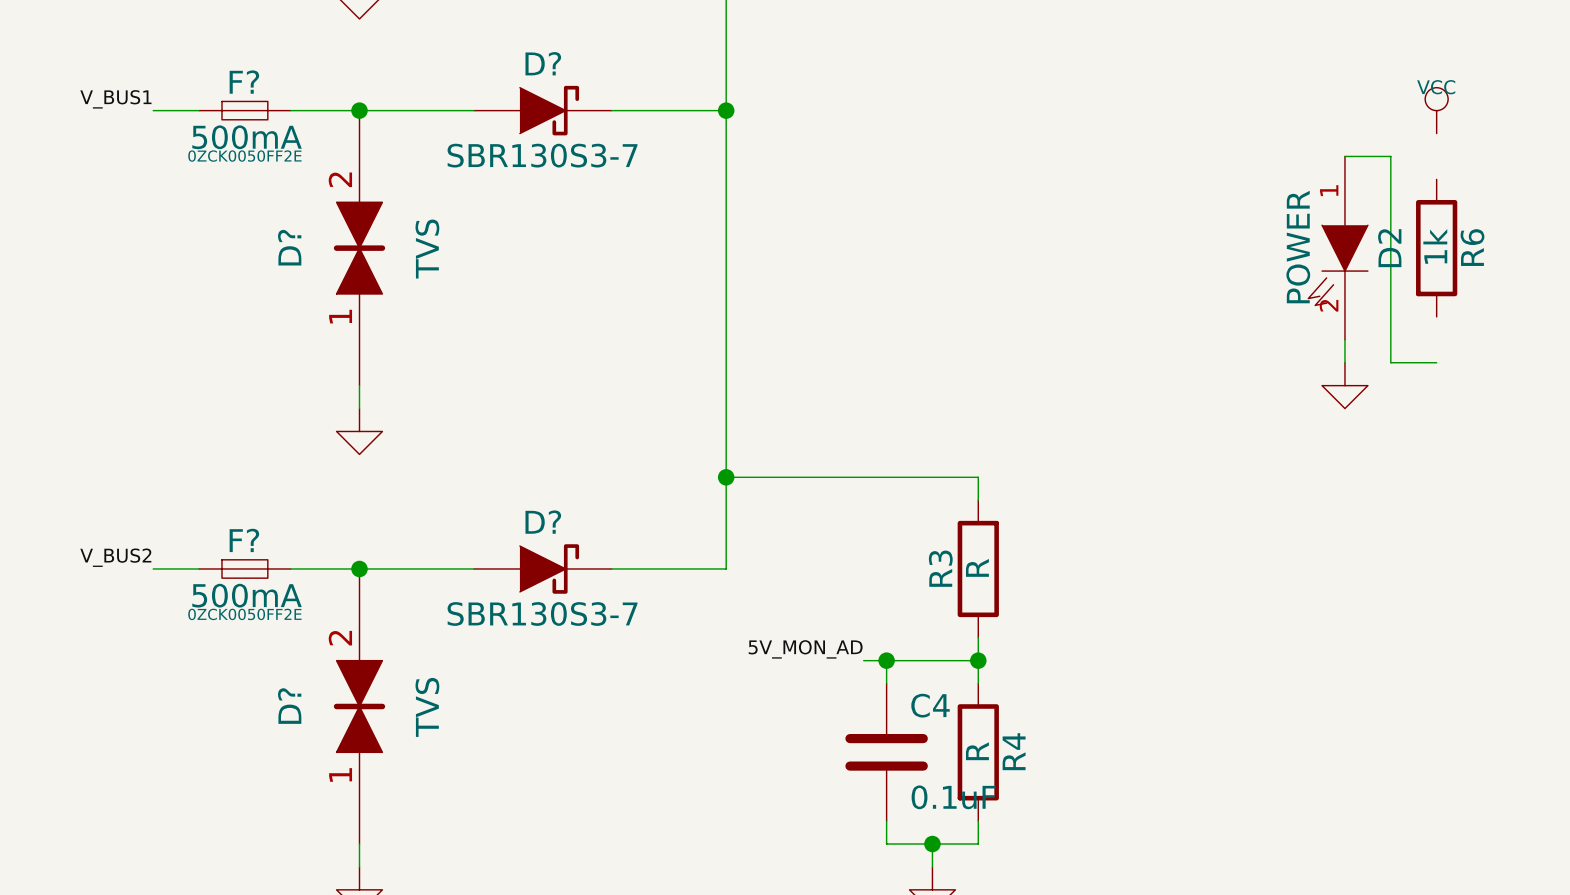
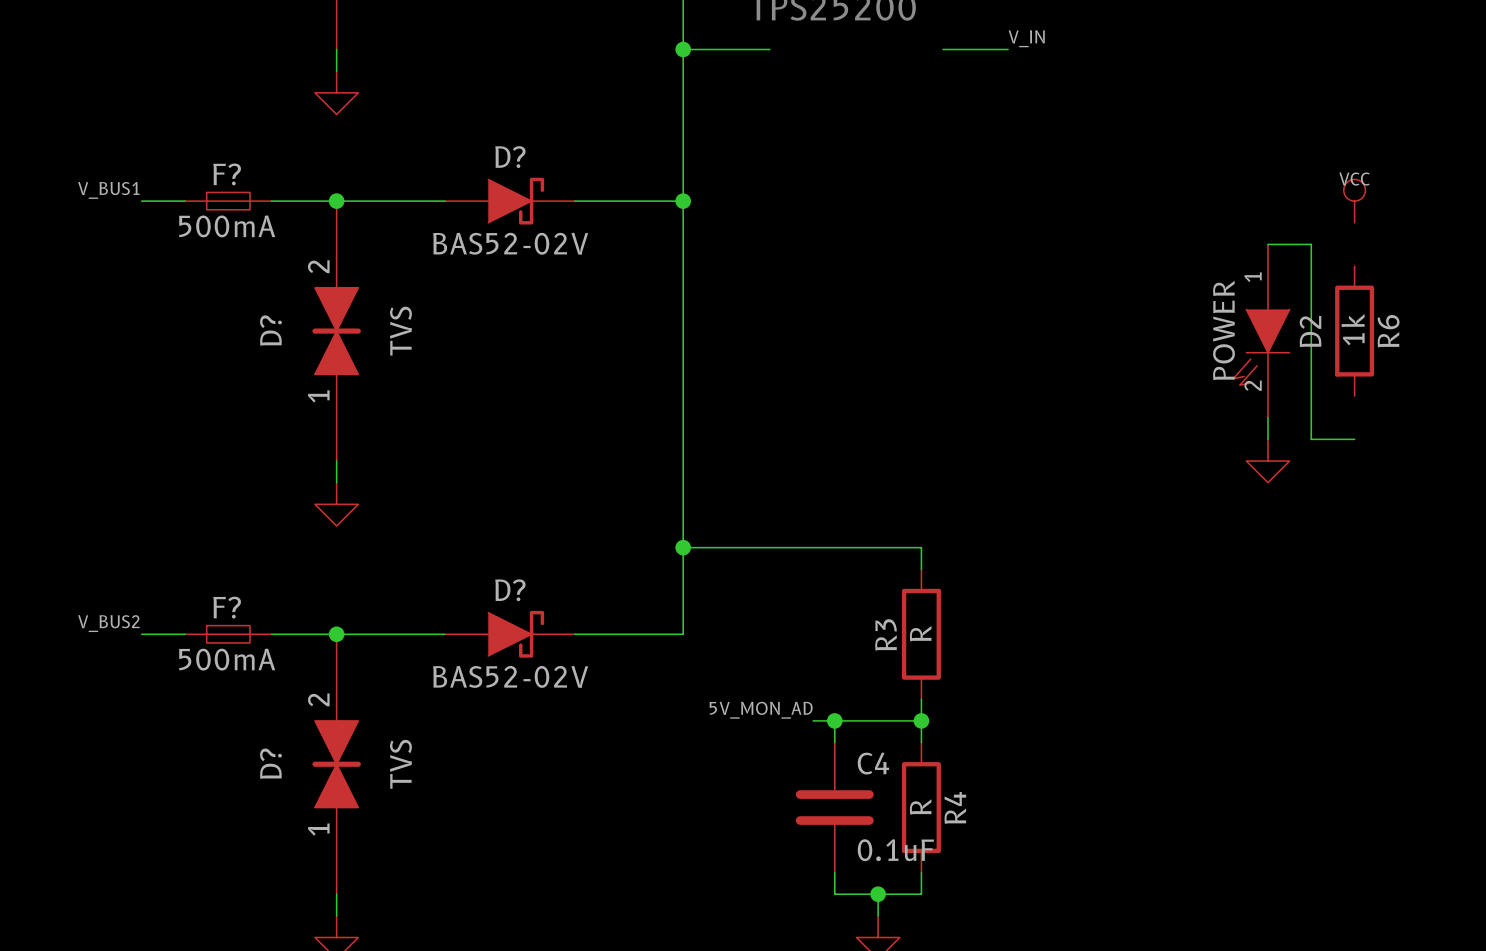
D? value: SBR130S3-7 (542, 155) -> BAS52-02V (510, 243)
F? text: 0ZCK0050FF2E (244, 156) -> none
D? value: SBR130S3-7 (542, 613) -> BAS52-02V (510, 676)
F? text: 0ZCK0050FF2E (244, 614) -> none

